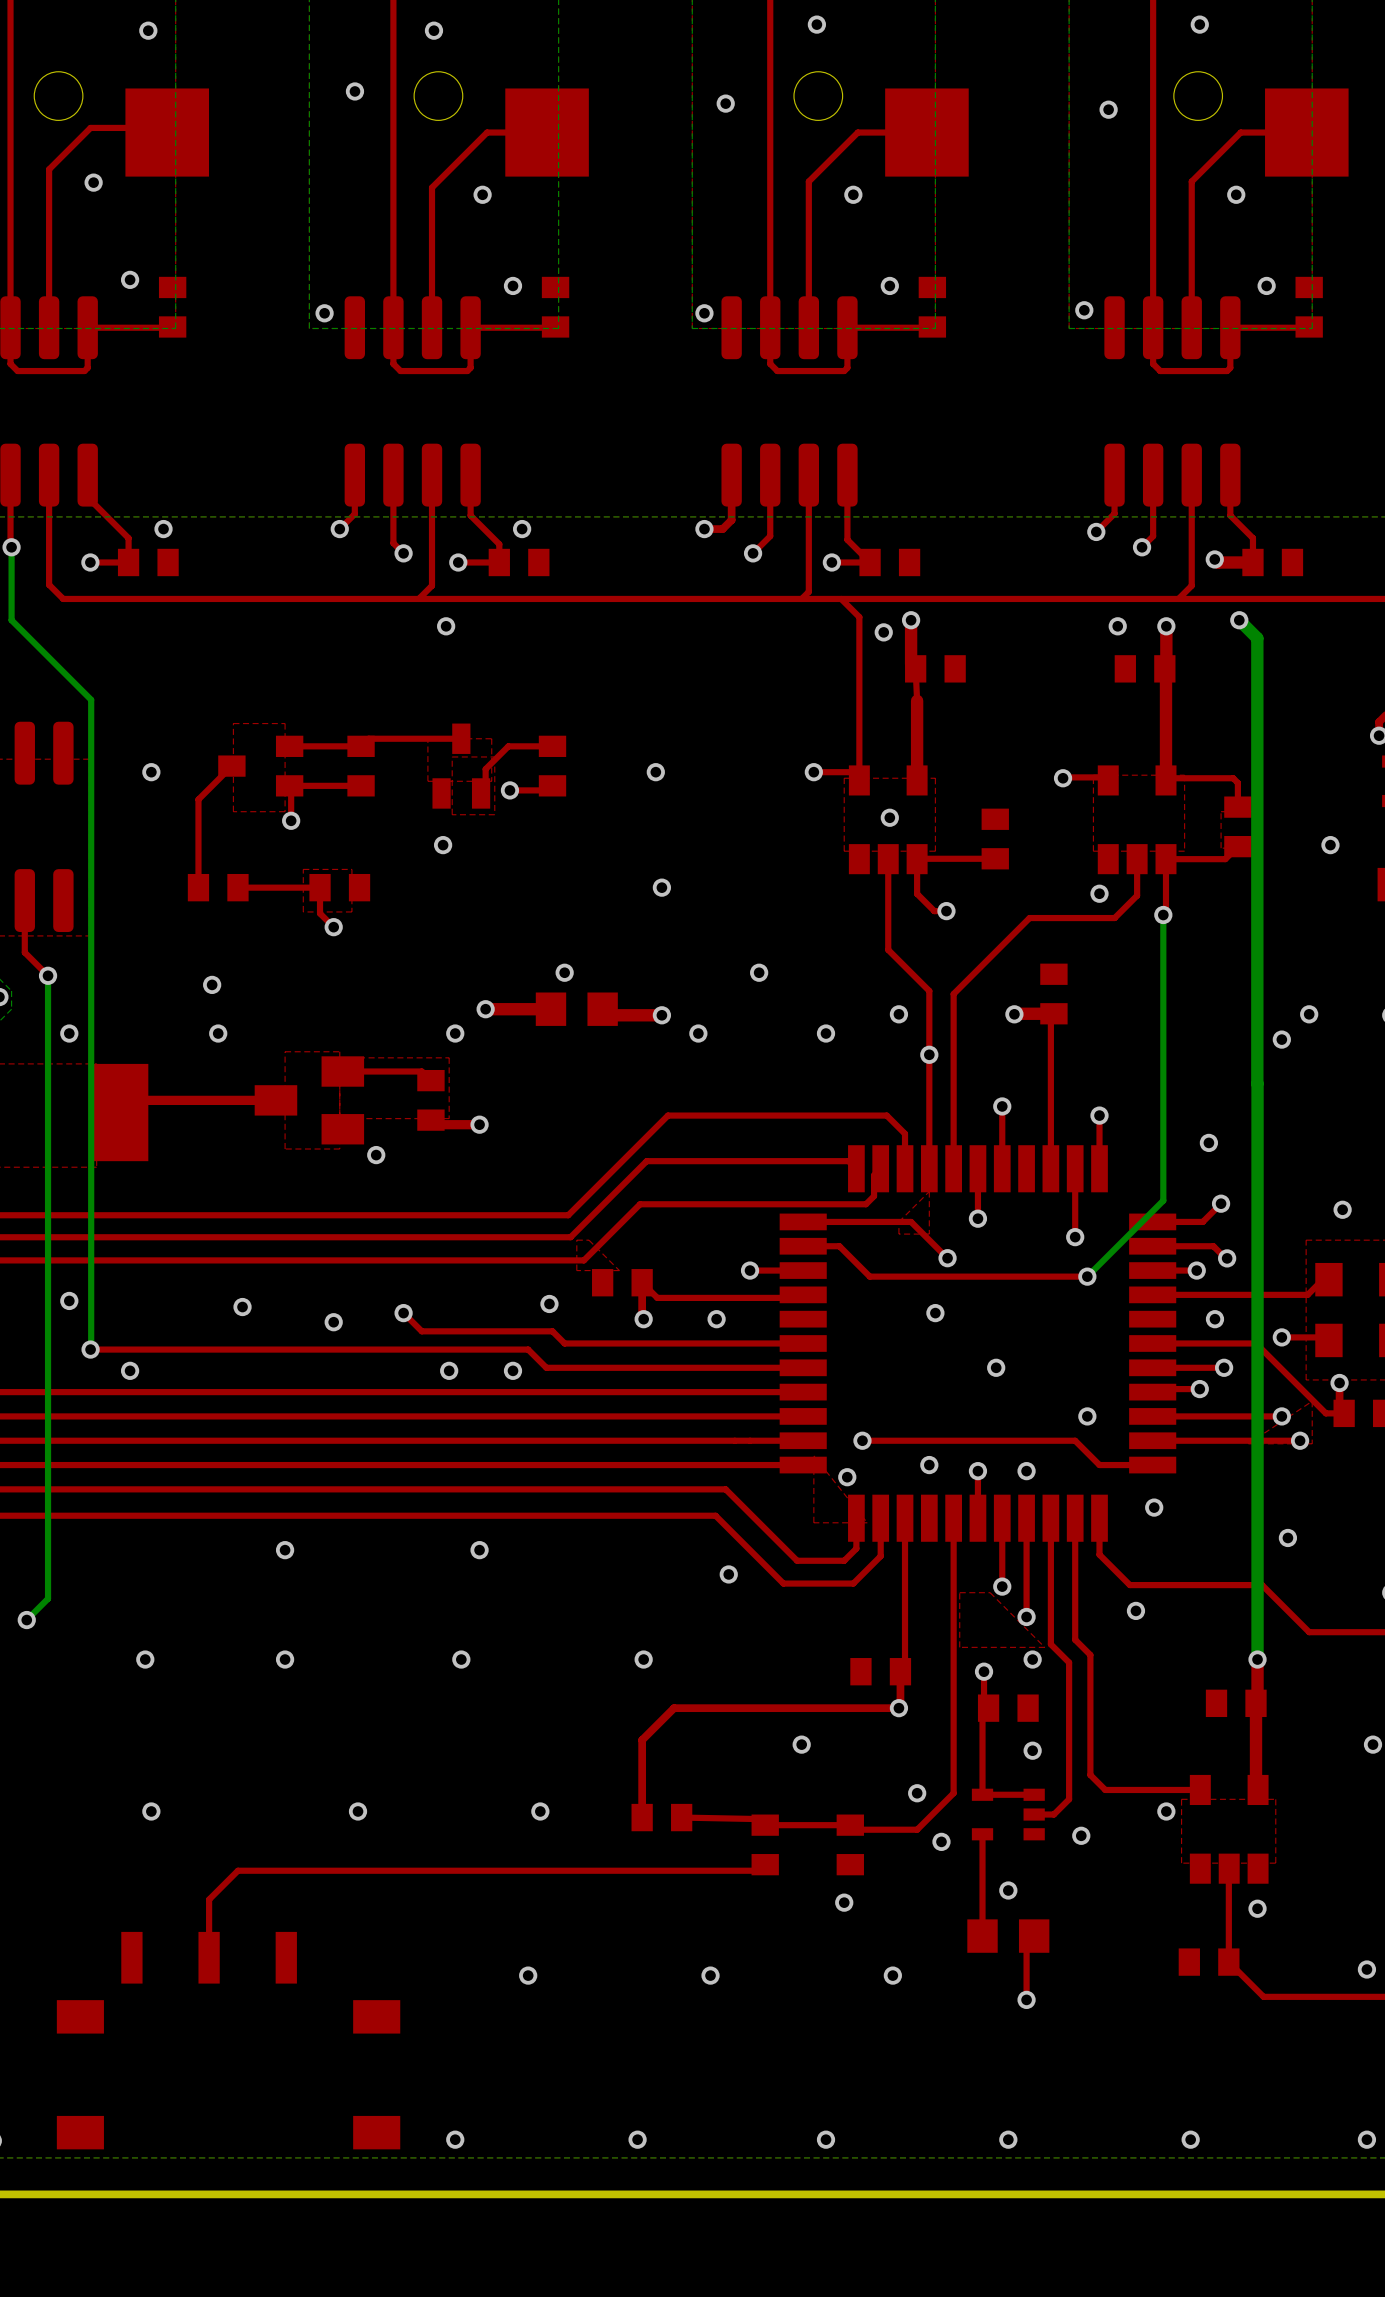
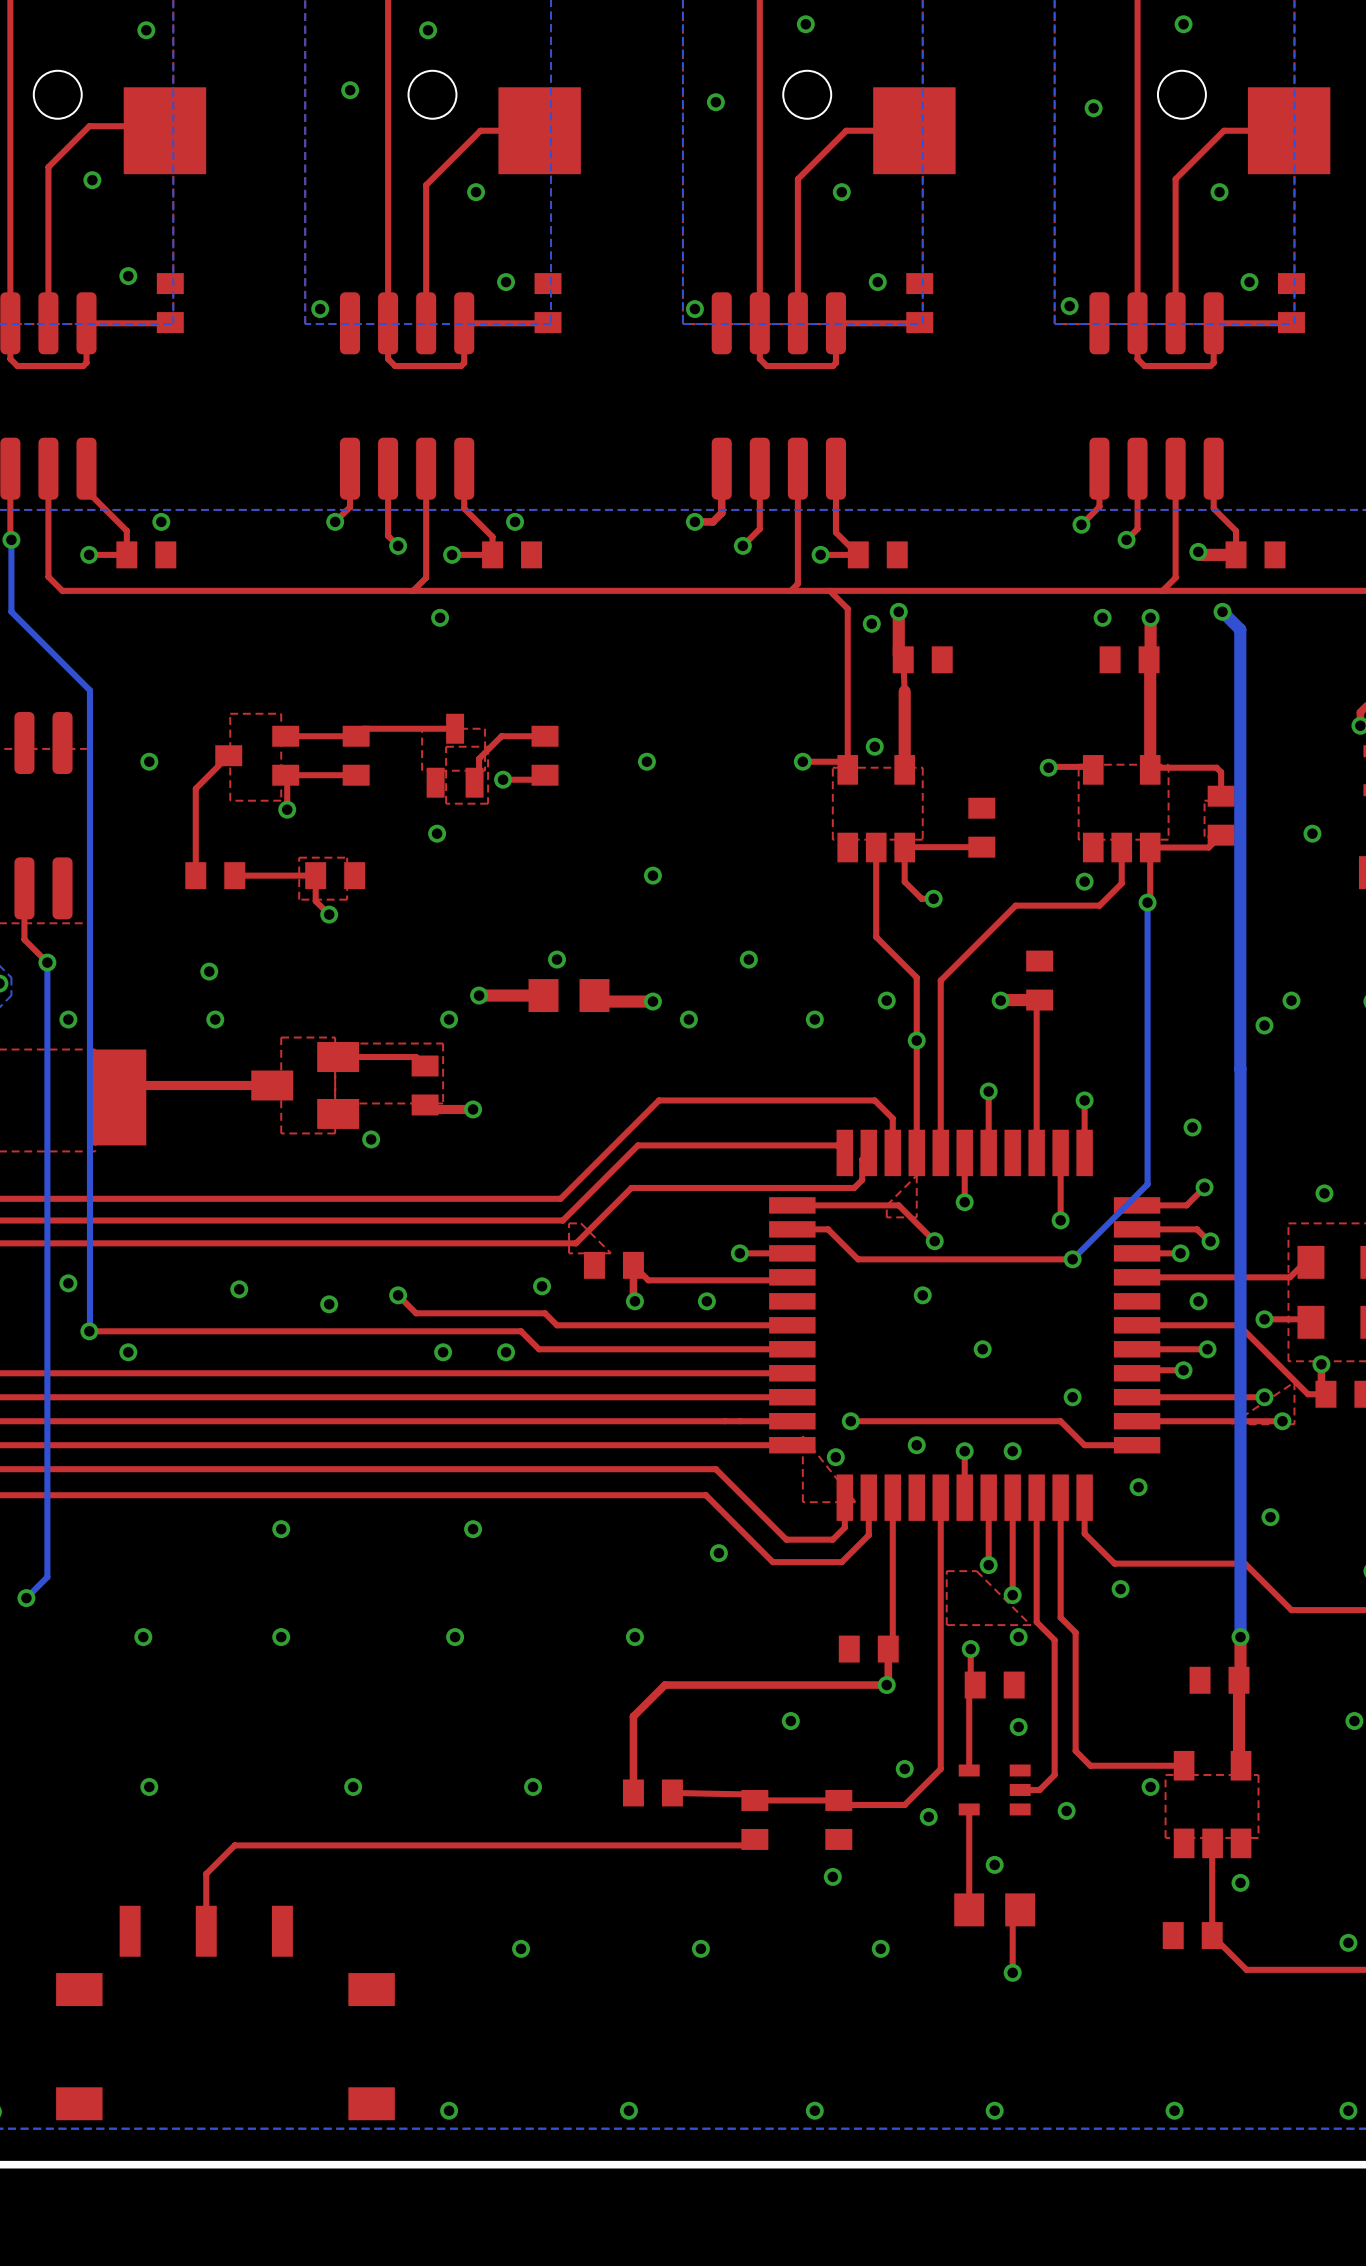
via position: (889, 817) -> (874, 746)
top track: (1034, 1794) (982, 1794) -> none

